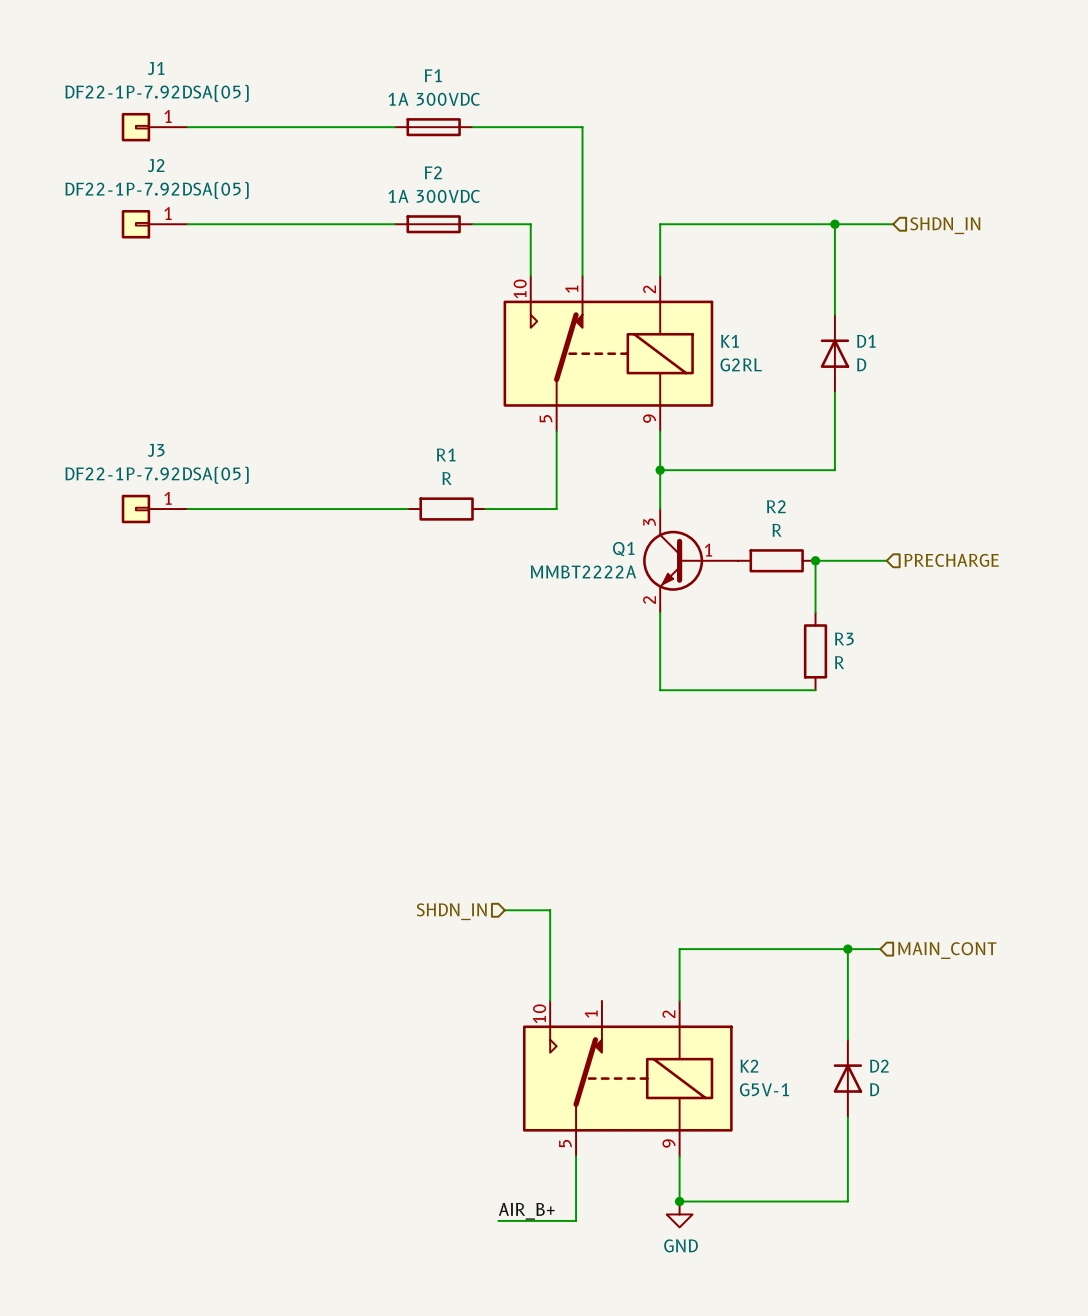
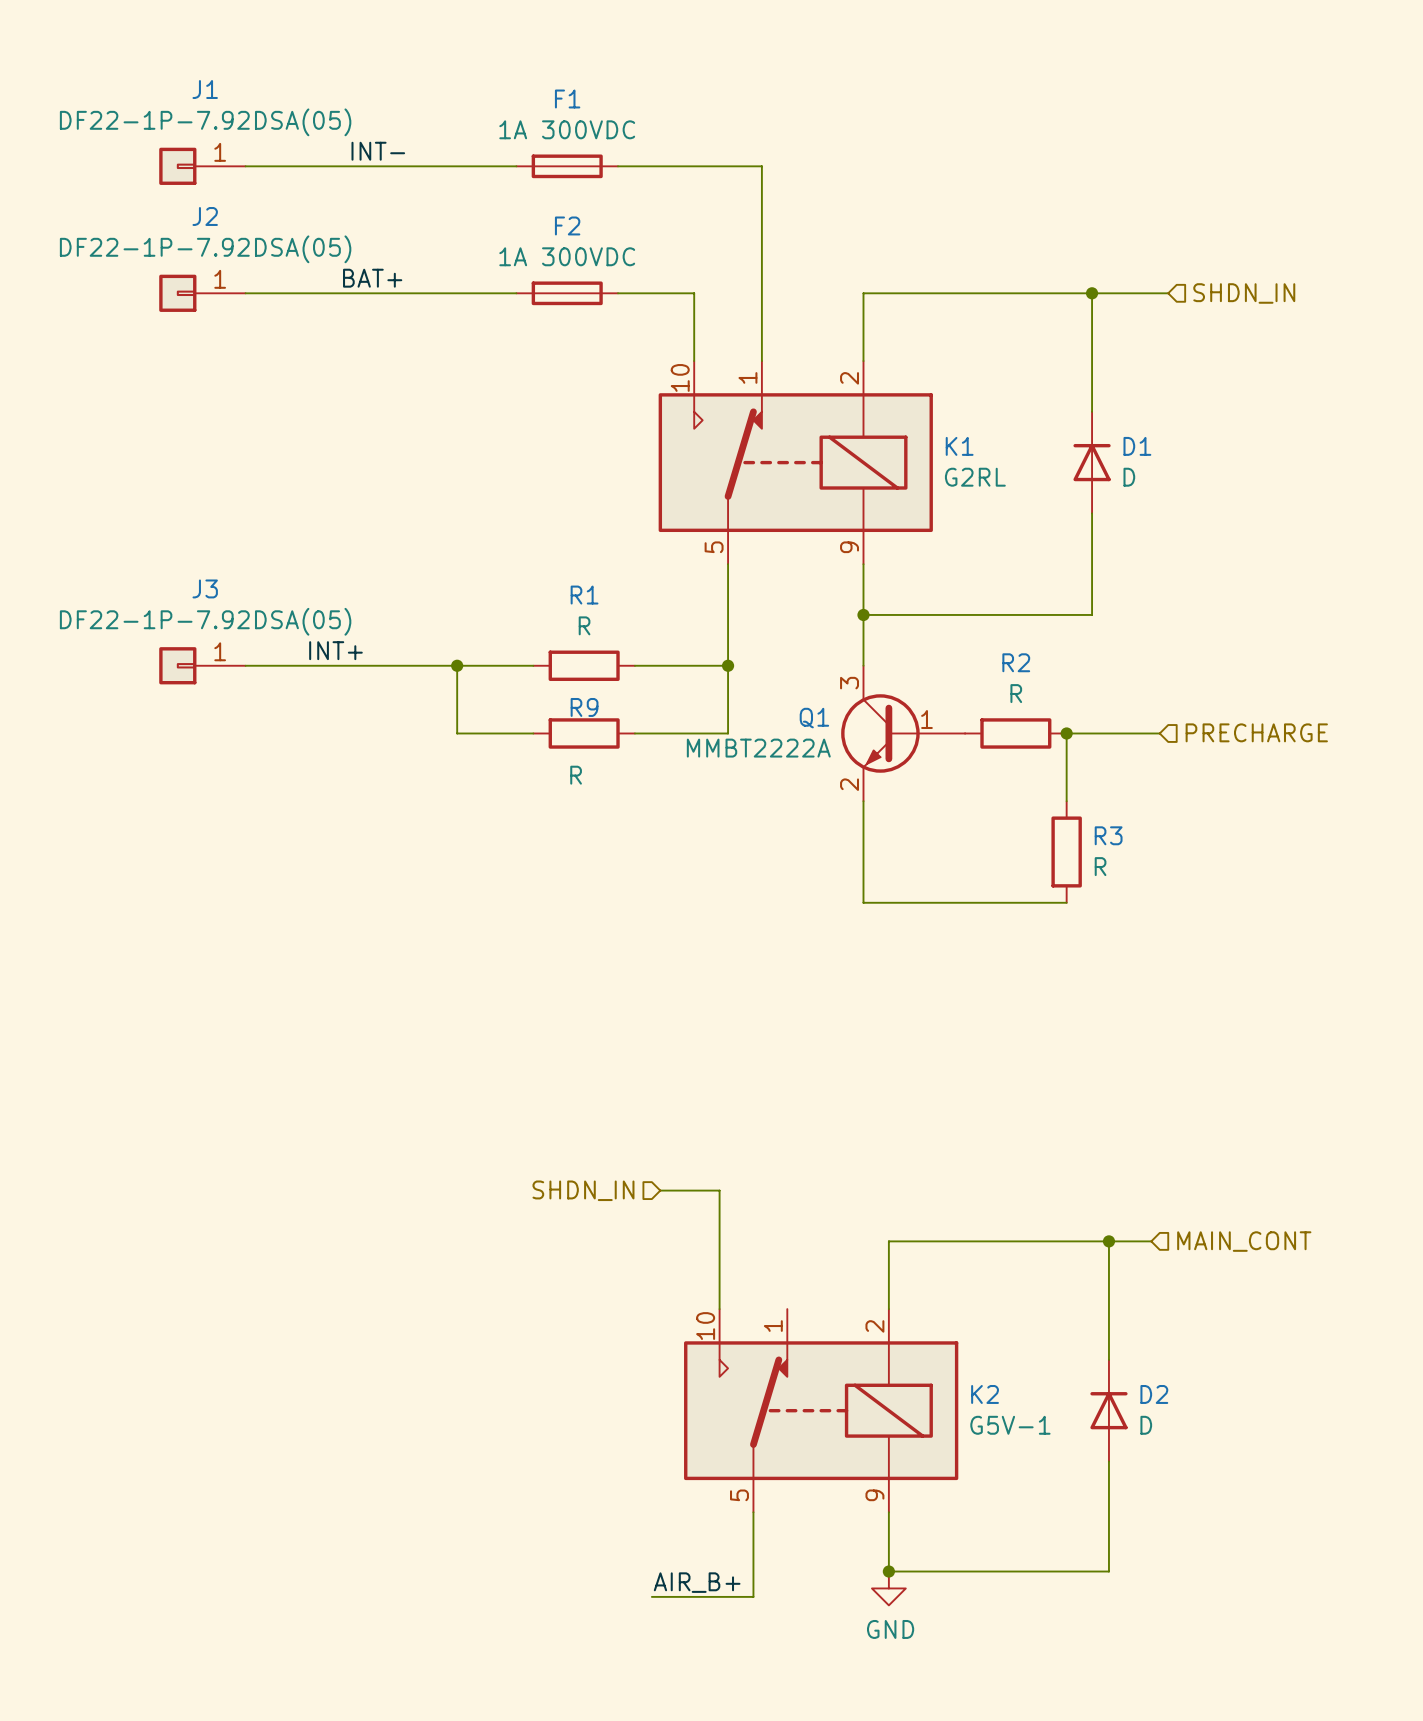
label: none -> INT- (378, 151)
label: none -> BAT+ (372, 278)
label: none -> INT+ (335, 650)
wire: none -> (457, 665) (457, 733) (533, 733)
junction: none -> (457, 665)
wire: none -> (728, 665) (728, 733) (634, 733)
junction: none -> (728, 665)
R9: none -> R (584, 733)

